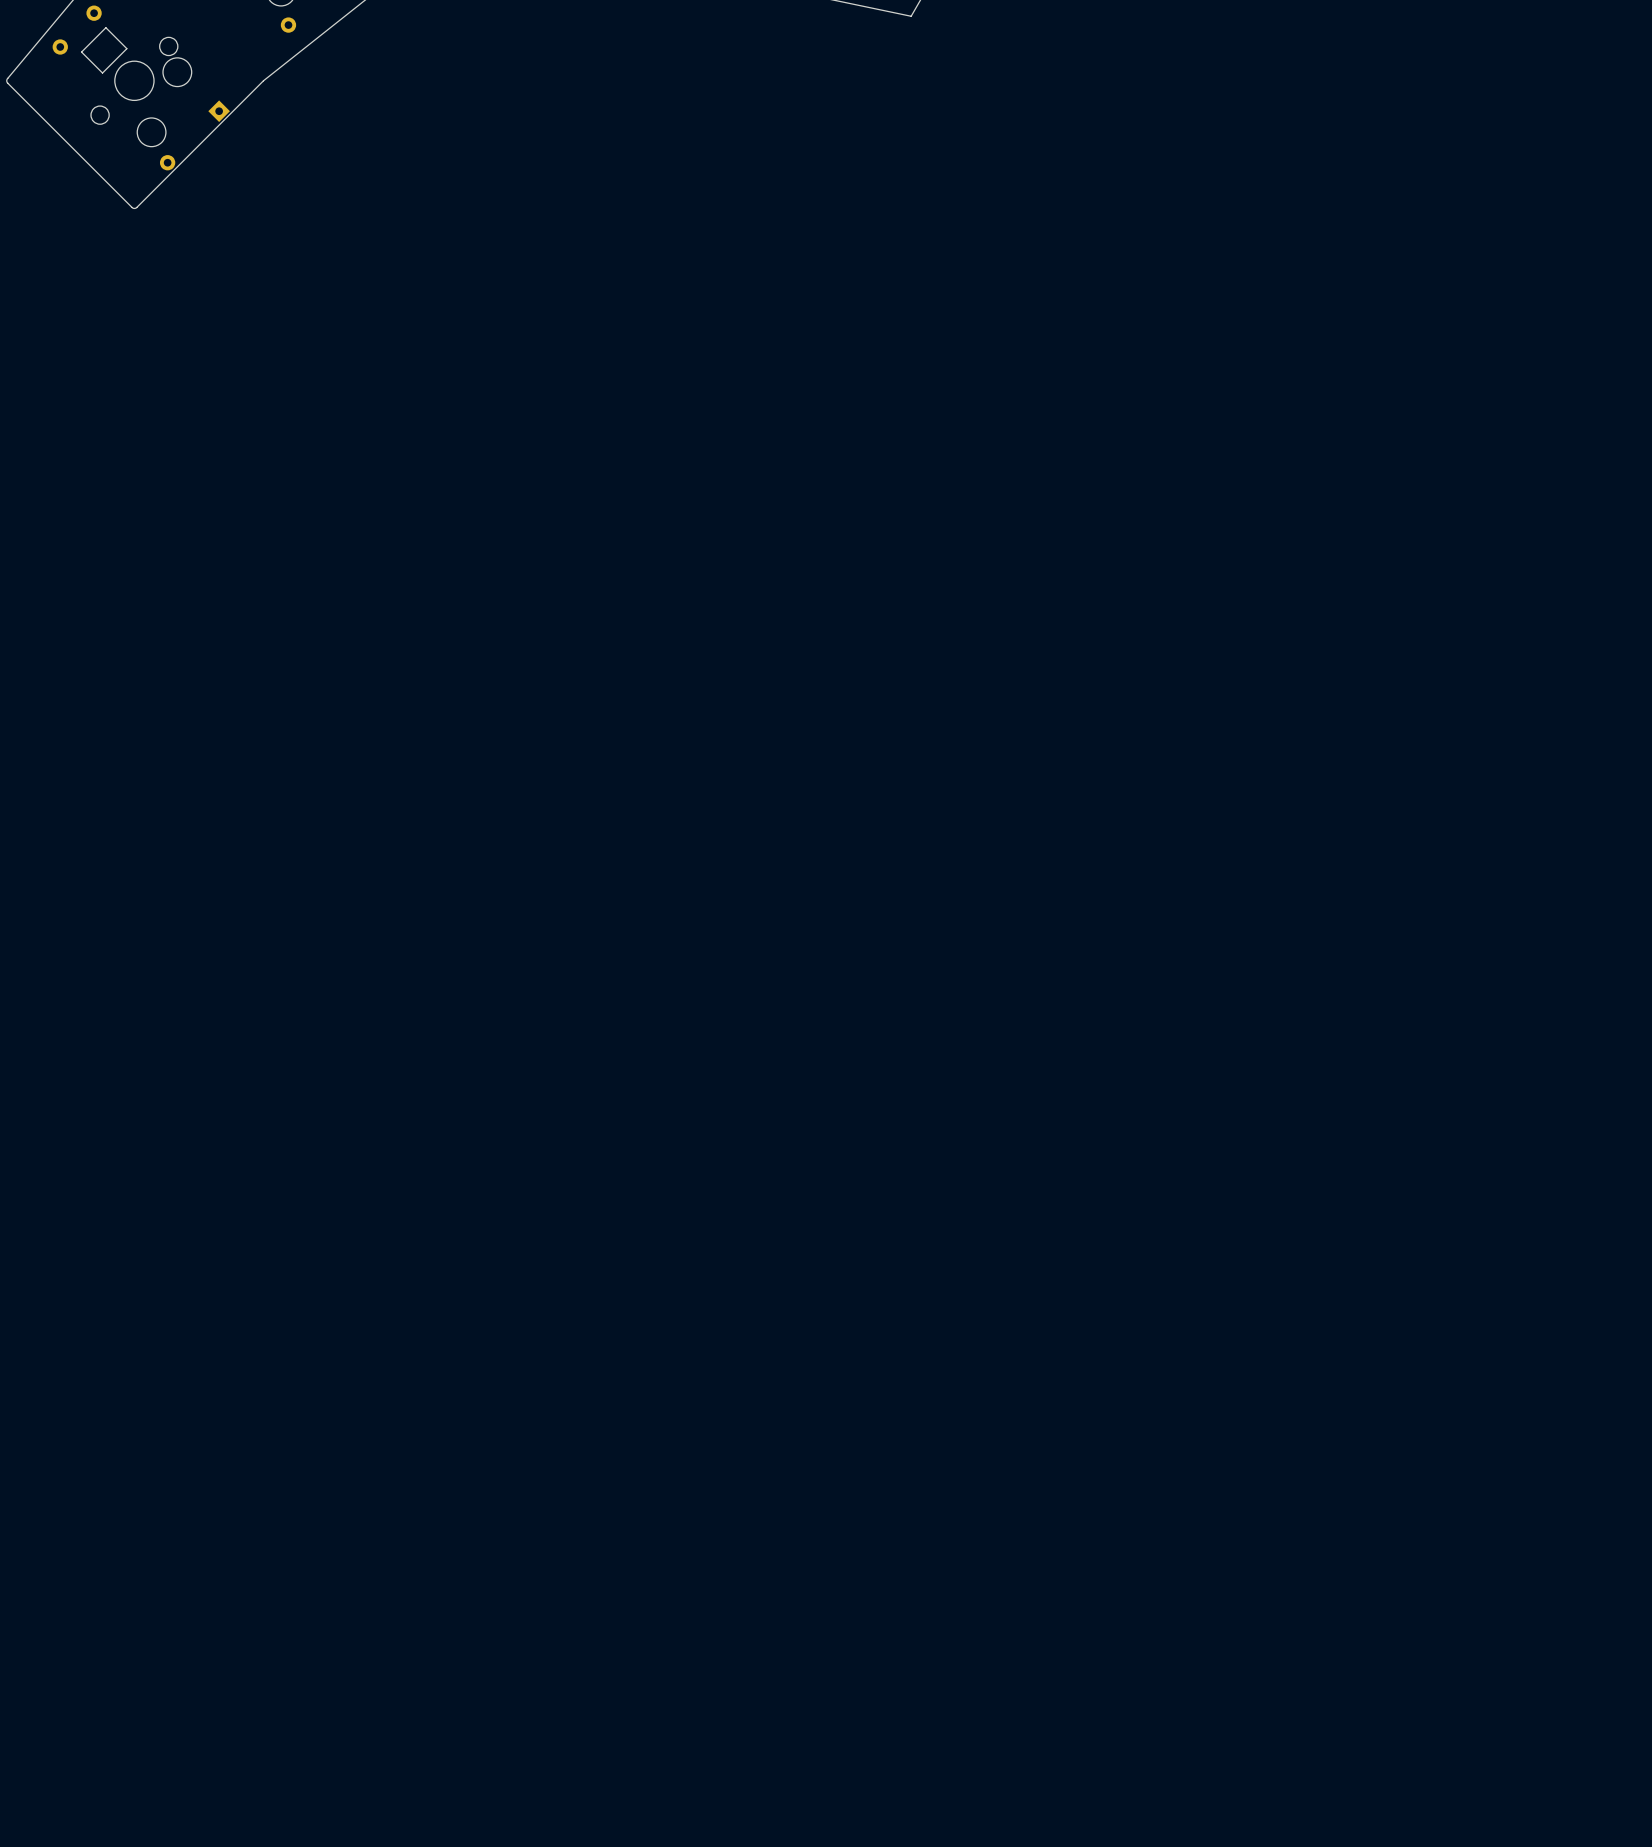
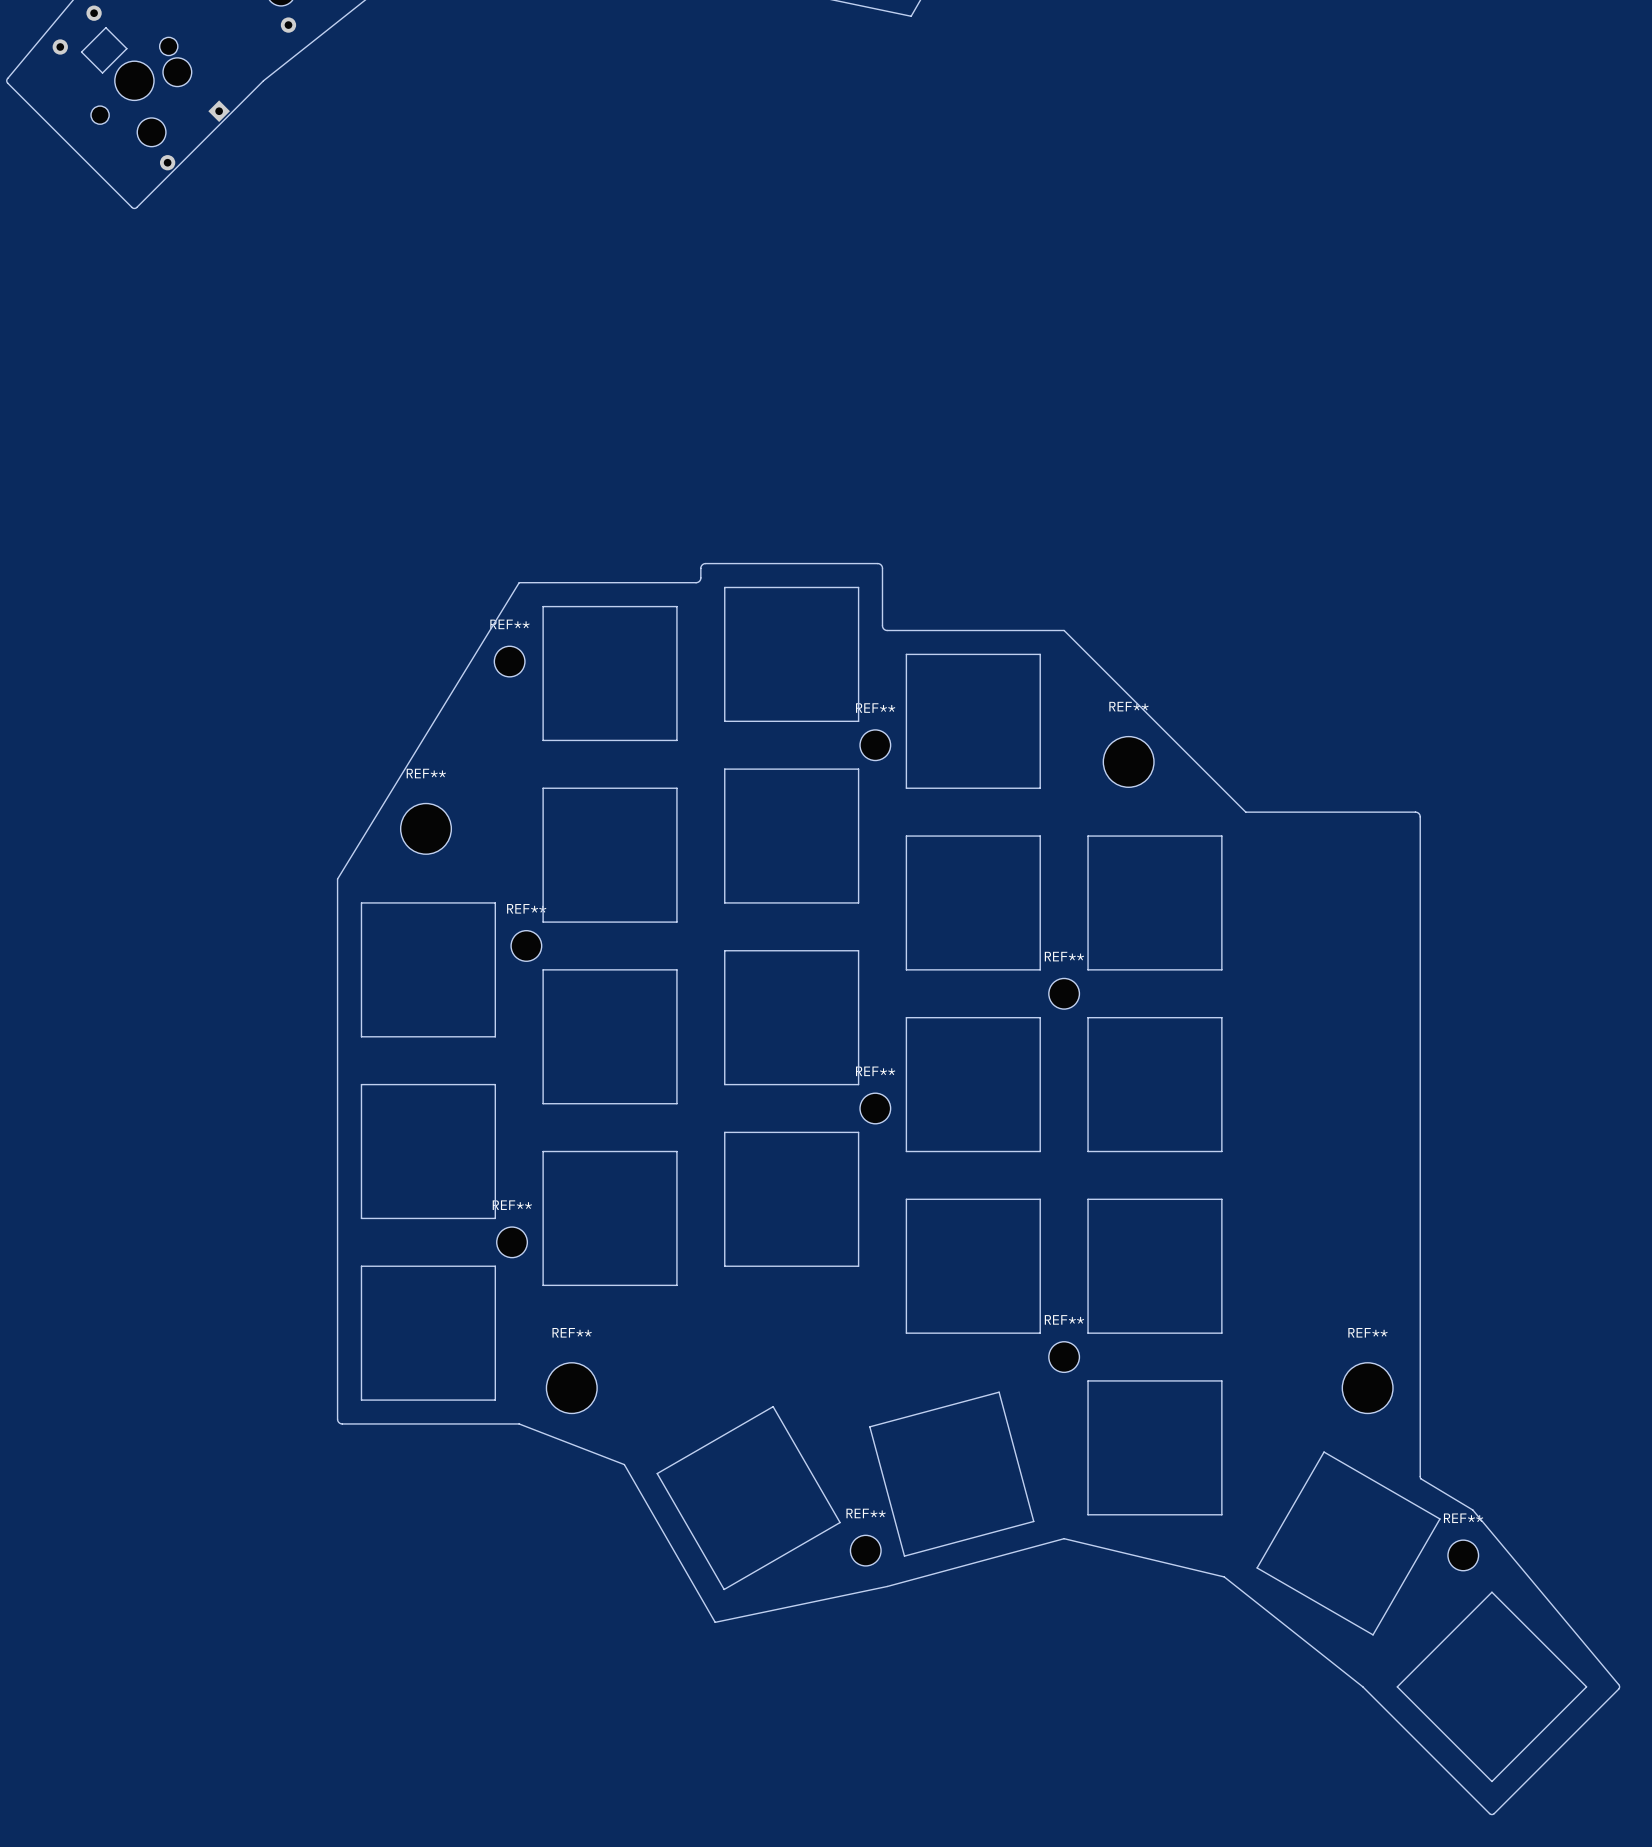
board edge: none -> (705, 563) (879, 563) (882, 567) (882, 625) (884, 629) (1064, 630) (1245, 812) (1415, 812) (1419, 814) (1420, 1477) (1472, 1510) (1619, 1686) (1493, 1814) (1489, 1813) (1362, 1686) (1224, 1576) (1064, 1538) (887, 1586) (715, 1622) (624, 1464) (519, 1423) (342, 1423) (338, 1421) (337, 879) (519, 582) (696, 582) (700, 579) (701, 566) (705, 563)
drawing: none -> [724, 586, 860, 722]
drawing: none -> [542, 606, 678, 742]
drawing: none -> [905, 653, 1041, 789]
REF**: none -> (509, 661)
REF**: none -> (875, 745)
REF**: none -> (1128, 761)
drawing: none -> [724, 768, 860, 904]
drawing: none -> [542, 787, 678, 923]
REF**: none -> (426, 828)
drawing: none -> [905, 835, 1041, 971]
drawing: none -> [1087, 835, 1223, 971]
drawing: none -> [360, 902, 496, 1038]
REF**: none -> (526, 945)
drawing: none -> [724, 950, 860, 1086]
drawing: none -> [542, 969, 678, 1105]
REF**: none -> (1064, 993)
drawing: none -> [905, 1017, 1041, 1153]
drawing: none -> [1087, 1017, 1223, 1153]
drawing: none -> [360, 1084, 496, 1220]
REF**: none -> (875, 1108)
drawing: none -> [724, 1131, 860, 1267]
drawing: none -> [542, 1150, 678, 1286]
drawing: none -> [905, 1198, 1041, 1334]
drawing: none -> [1087, 1198, 1223, 1334]
REF**: none -> (512, 1242)
drawing: none -> [360, 1265, 496, 1401]
REF**: none -> (1064, 1357)
drawing: none -> [1087, 1380, 1223, 1516]
REF**: none -> (571, 1388)
REF**: none -> (1367, 1388)
drawing: none -> [869, 1391, 1035, 1557]
drawing: none -> [656, 1406, 841, 1591]
drawing: none -> [1256, 1451, 1588, 1783]
REF**: none -> (865, 1550)
REF**: none -> (1463, 1555)

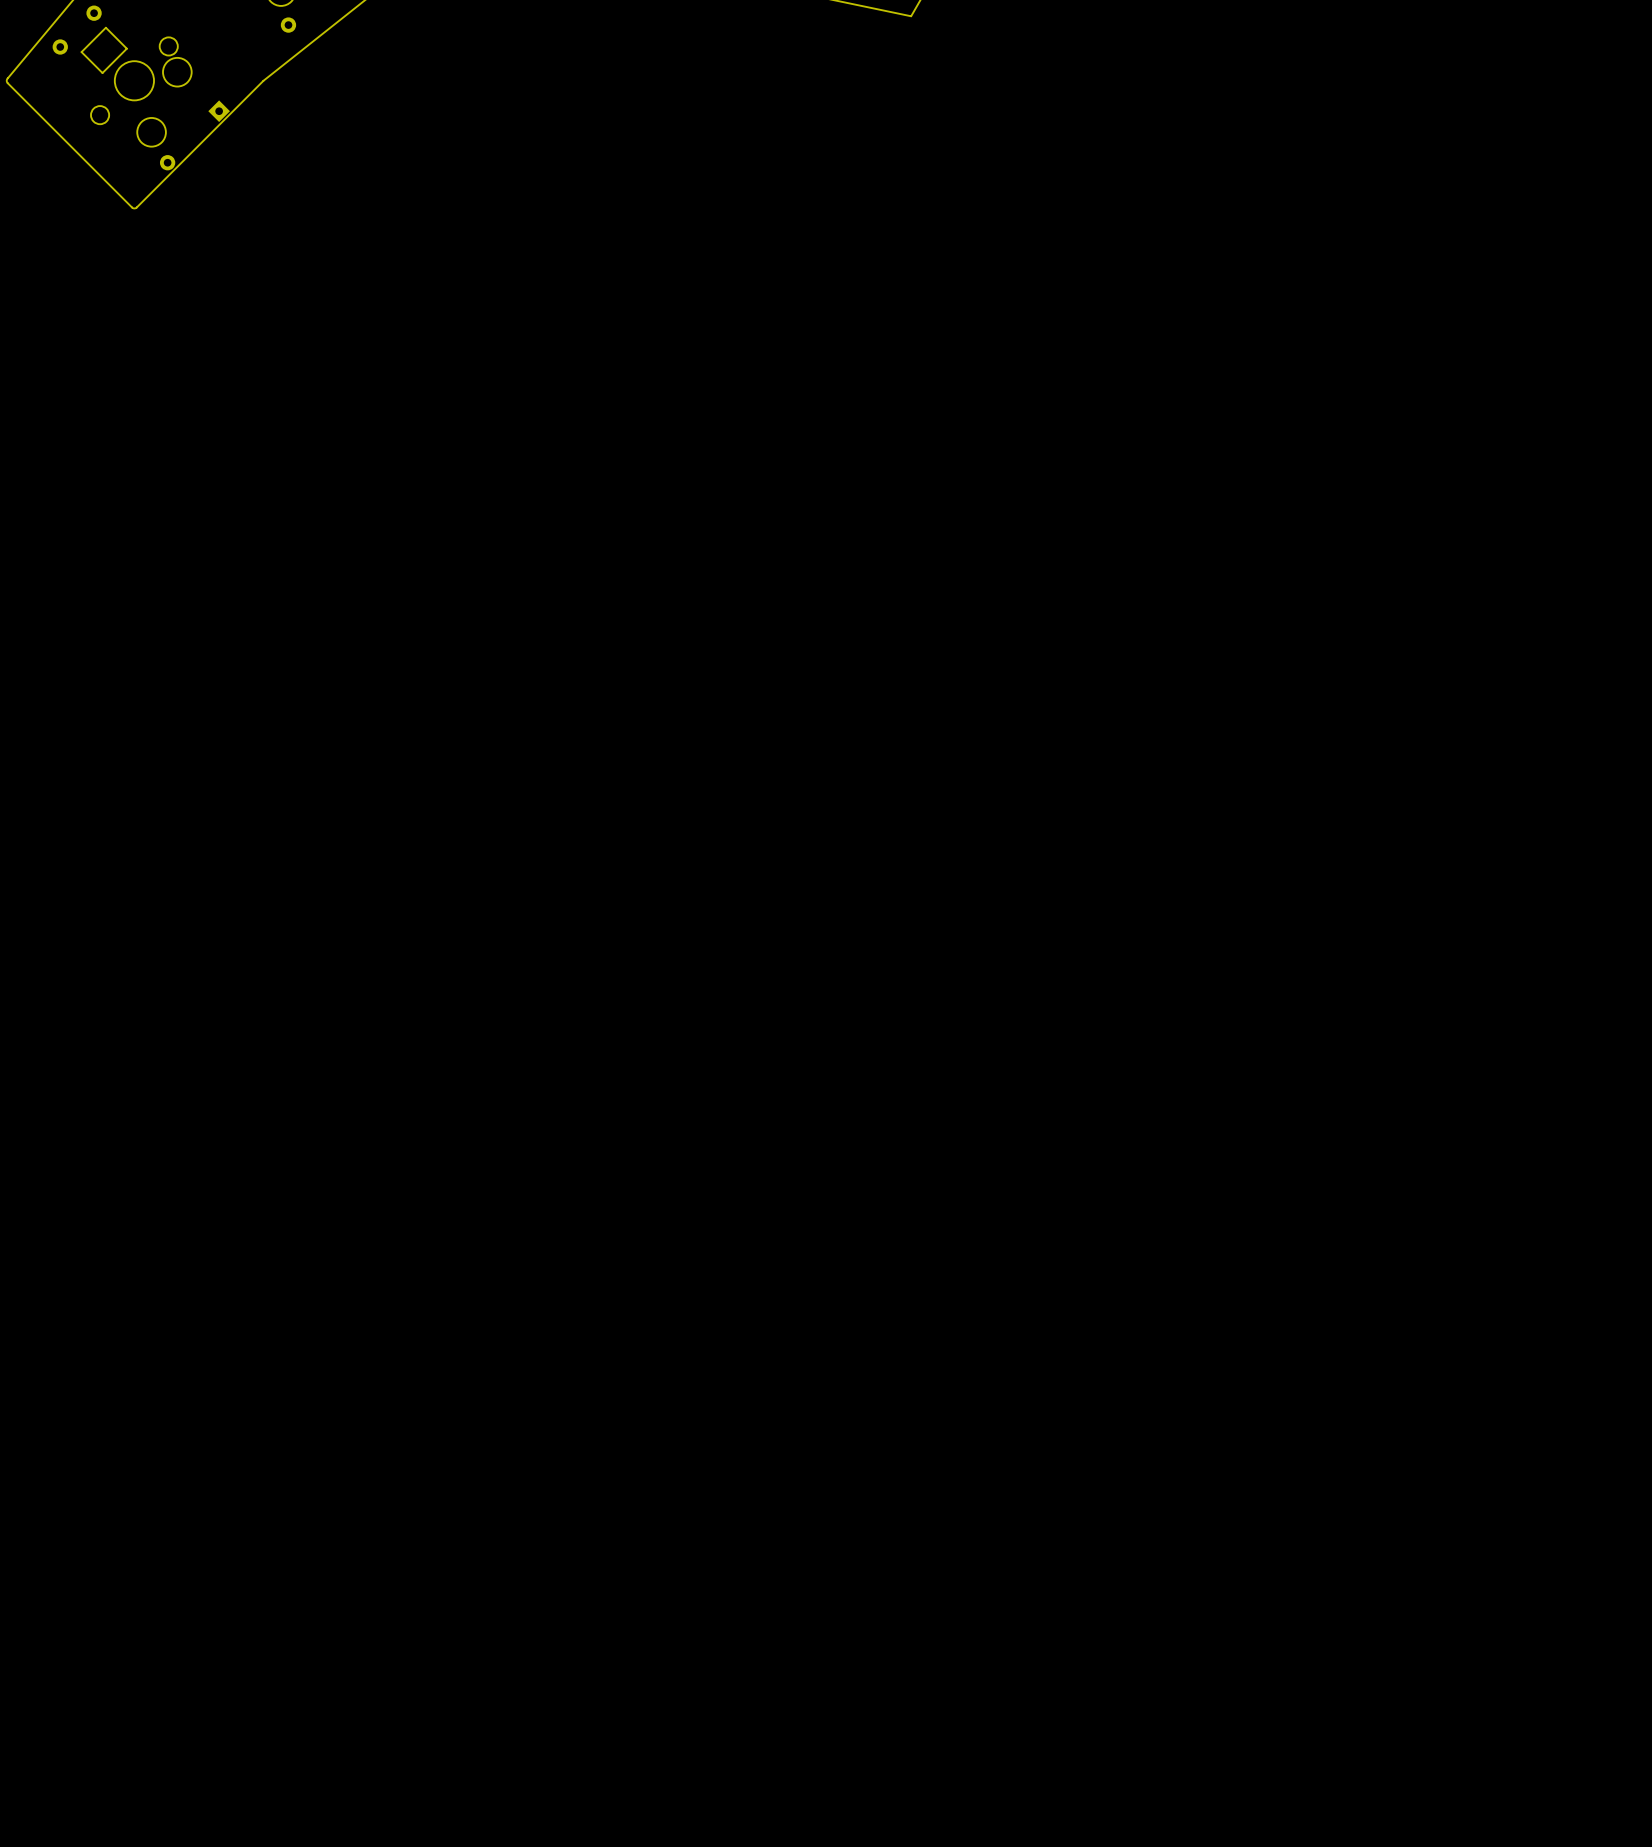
board edge: (705, 563) (879, 563) (882, 567) (882, 625) (884, 629) (1064, 630) (1245, 812) (1415, 812) (1419, 814) (1420, 1477) (1472, 1510) (1619, 1686) (1493, 1814) (1489, 1813) (1362, 1686) (1224, 1576) (1064, 1538) (887, 1586) (715, 1622) (624, 1464) (519, 1423) (342, 1423) (338, 1421) (337, 879) (519, 582) (696, 582) (700, 579) (701, 566) (705, 563) -> none
drawing: [724, 586, 860, 722] -> none
drawing: [542, 606, 678, 742] -> none
drawing: [905, 653, 1041, 789] -> none
REF**: (509, 661) -> none
REF**: (875, 745) -> none
REF**: (1128, 761) -> none
drawing: [724, 768, 860, 904] -> none
drawing: [542, 787, 678, 923] -> none
REF**: (426, 828) -> none
drawing: [905, 835, 1041, 971] -> none
drawing: [1087, 835, 1223, 971] -> none
drawing: [360, 902, 496, 1038] -> none
REF**: (526, 945) -> none
drawing: [724, 950, 860, 1086] -> none
drawing: [542, 969, 678, 1105] -> none
REF**: (1064, 993) -> none
drawing: [905, 1017, 1041, 1153] -> none
drawing: [1087, 1017, 1223, 1153] -> none
drawing: [360, 1084, 496, 1220] -> none
REF**: (875, 1108) -> none
drawing: [724, 1131, 860, 1267] -> none
drawing: [542, 1150, 678, 1286] -> none
drawing: [905, 1198, 1041, 1334] -> none
drawing: [1087, 1198, 1223, 1334] -> none
REF**: (512, 1242) -> none
drawing: [360, 1265, 496, 1401] -> none
REF**: (1064, 1357) -> none
drawing: [1087, 1380, 1223, 1516] -> none
REF**: (571, 1388) -> none
REF**: (1367, 1388) -> none
drawing: [869, 1391, 1035, 1557] -> none
drawing: [656, 1406, 841, 1591] -> none
drawing: [1256, 1451, 1588, 1783] -> none
REF**: (865, 1550) -> none
REF**: (1463, 1555) -> none

